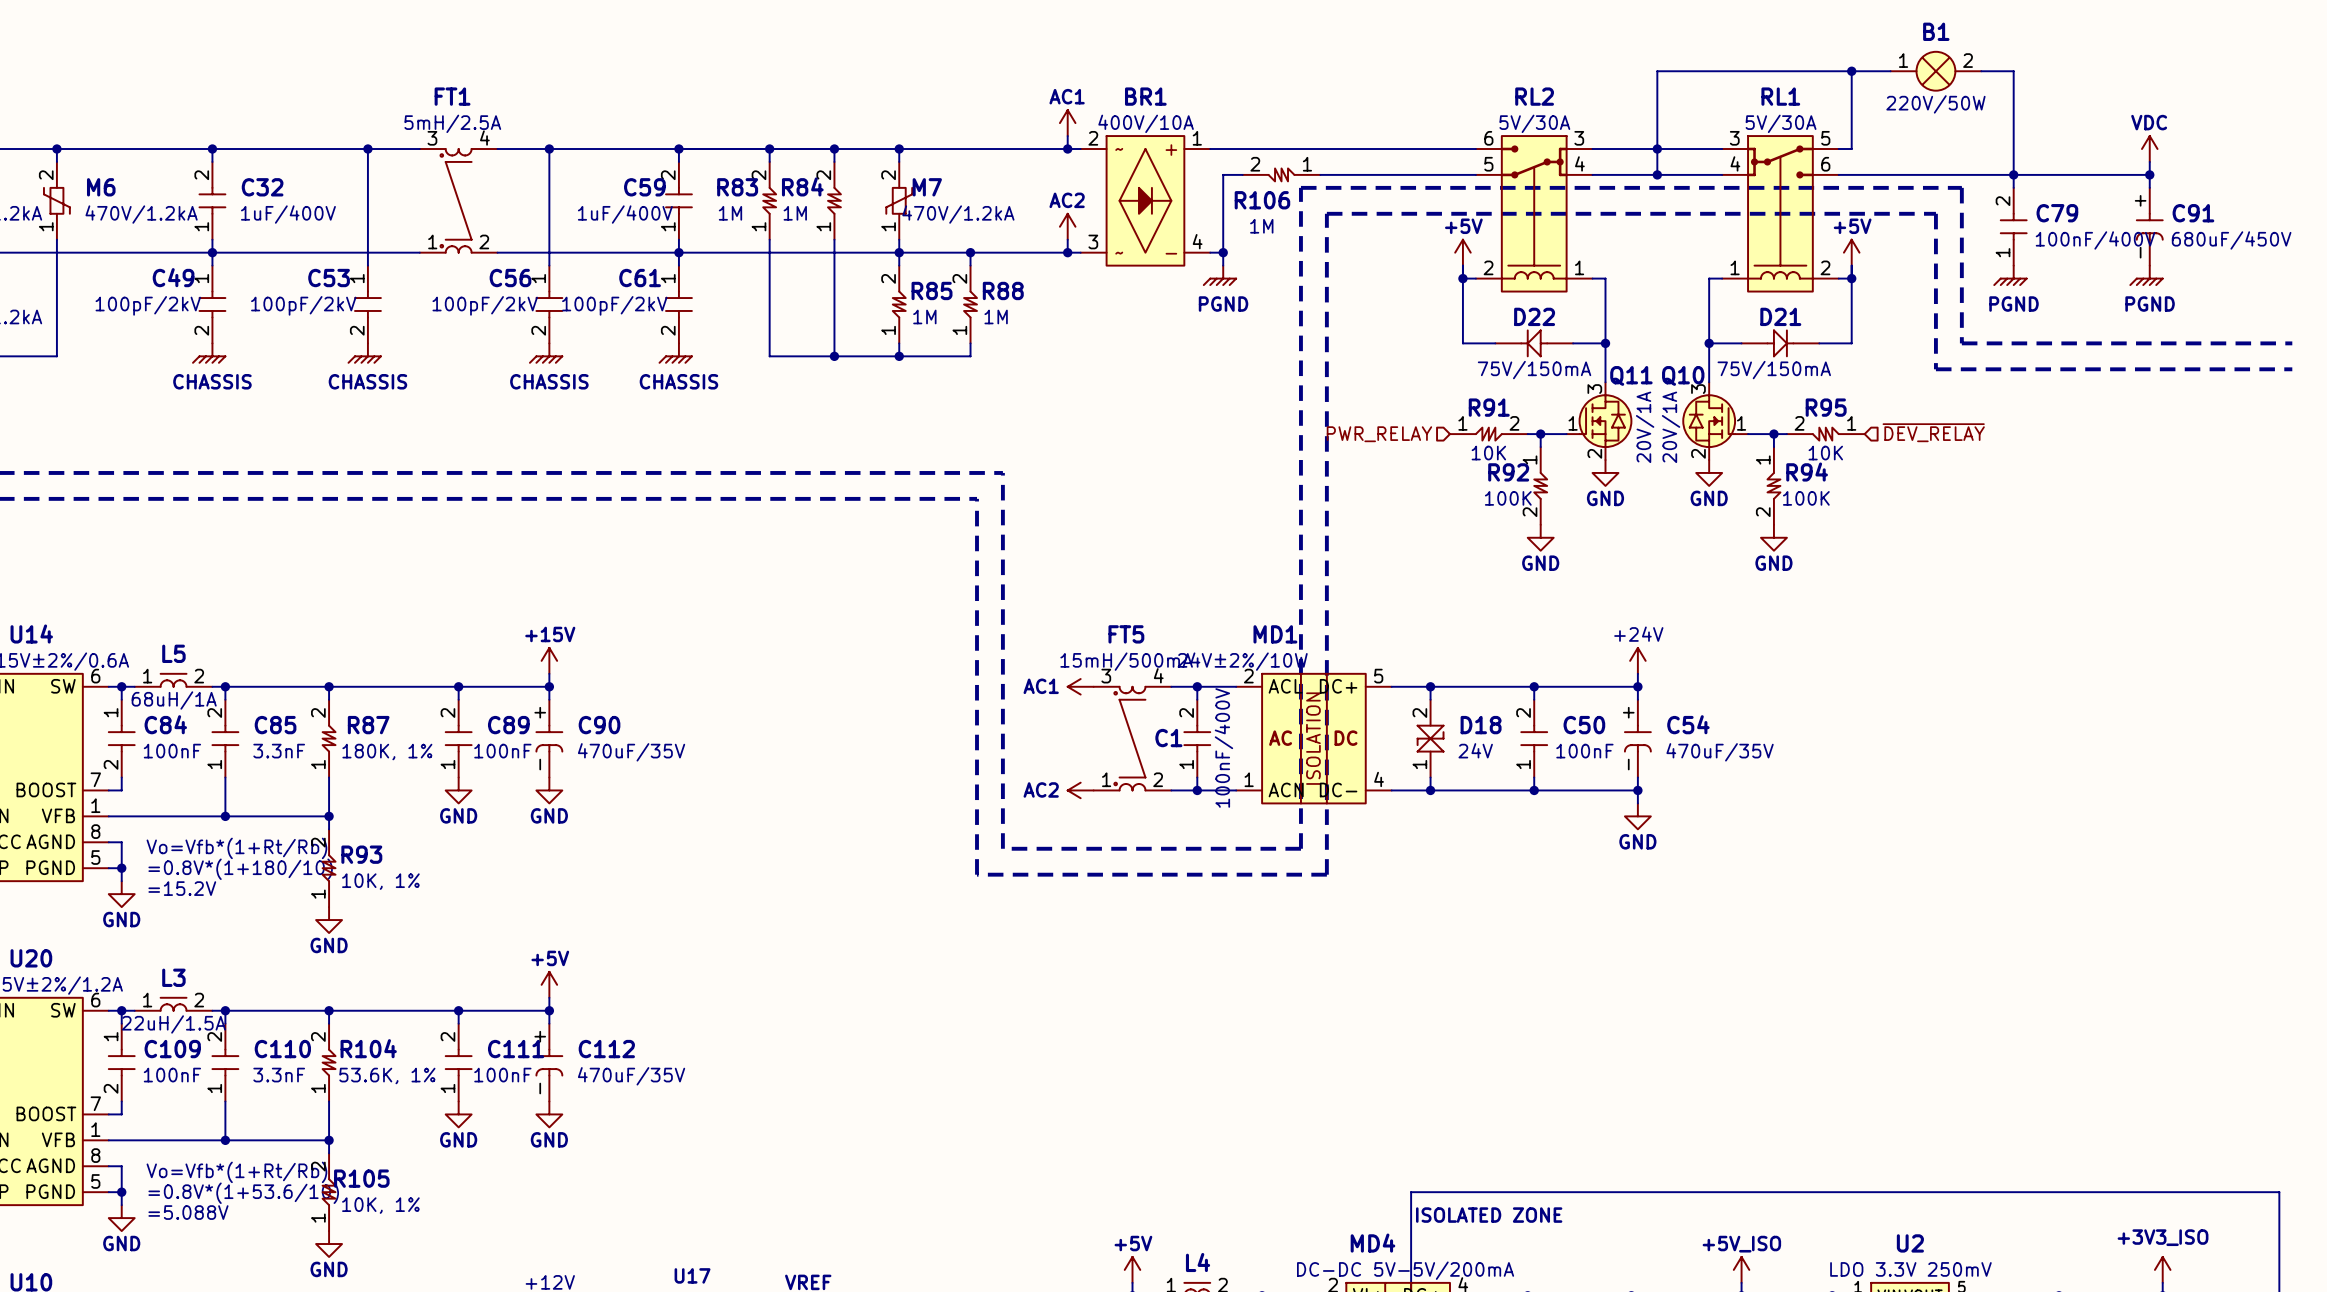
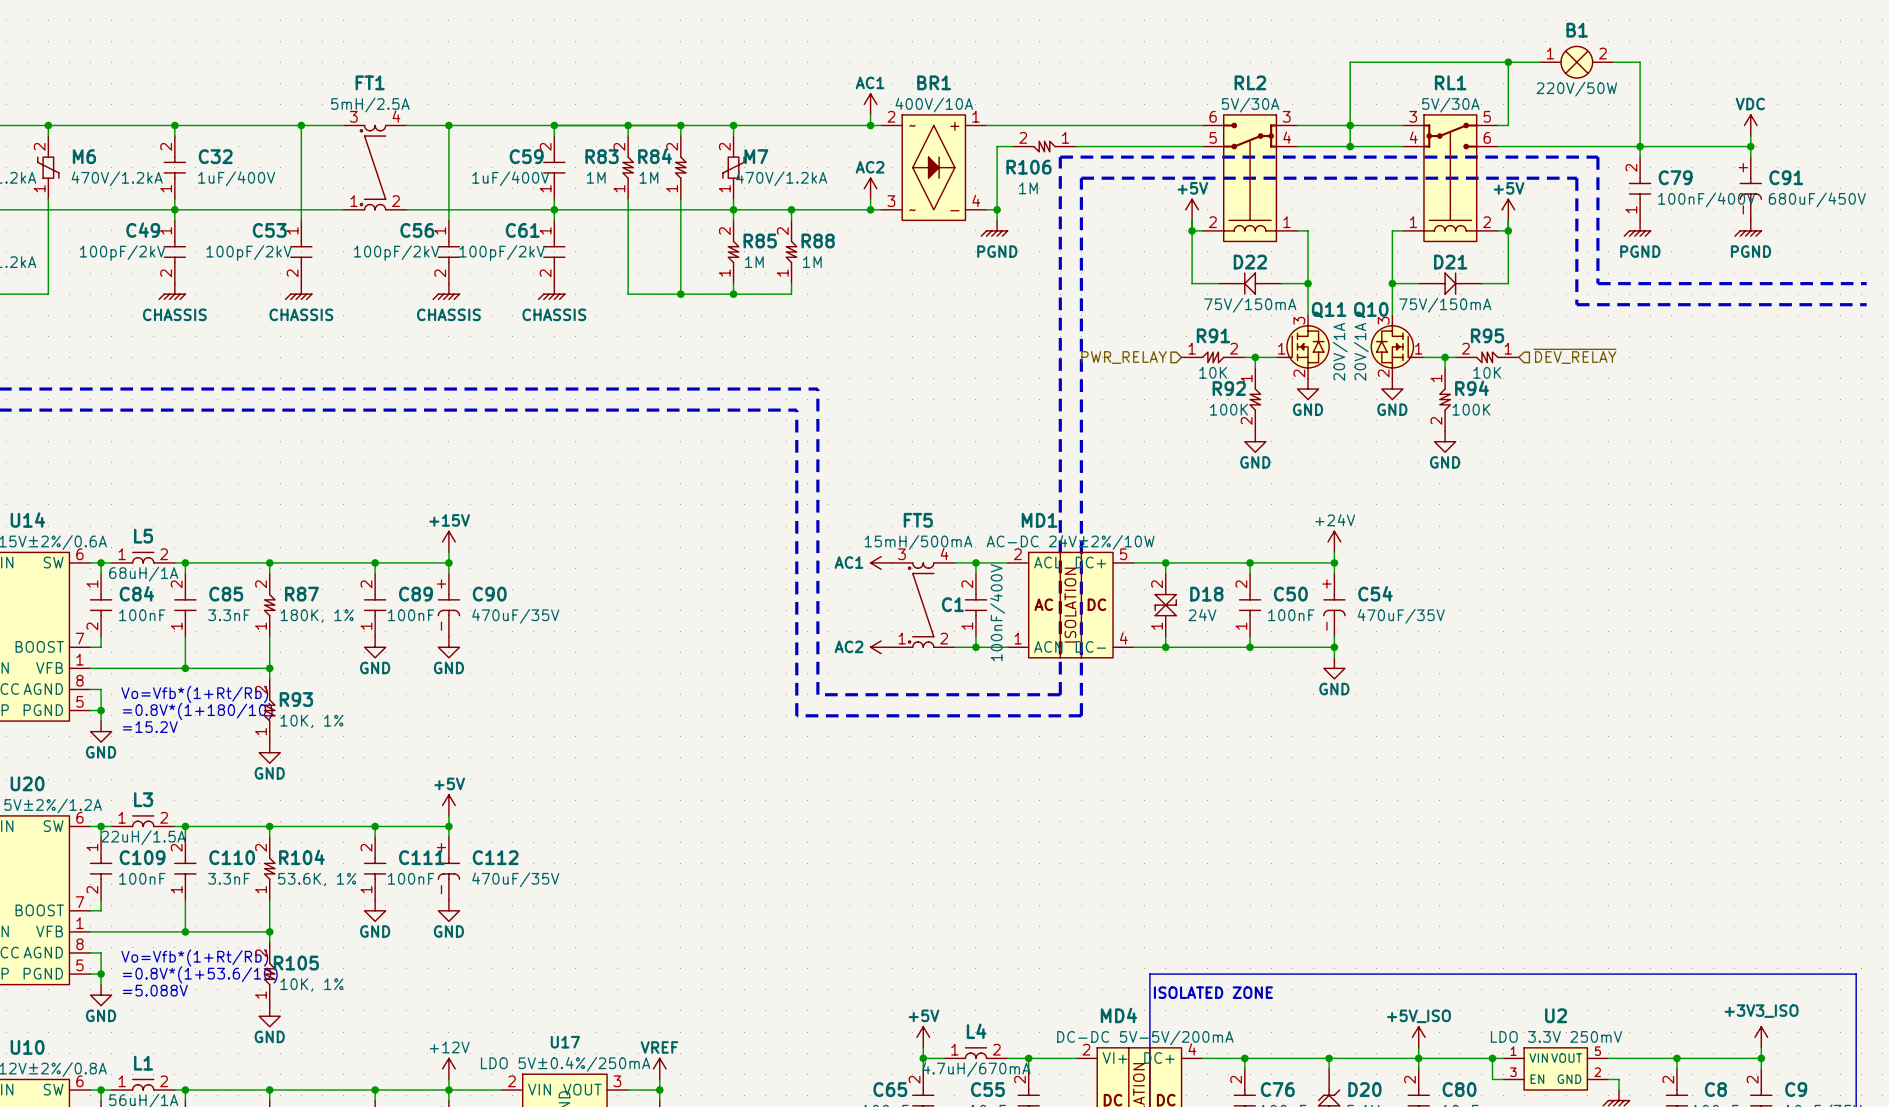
MD1 value: 24V±2%/10W (1242, 661) -> AC-DC 24V±2%/10W (1070, 542)

